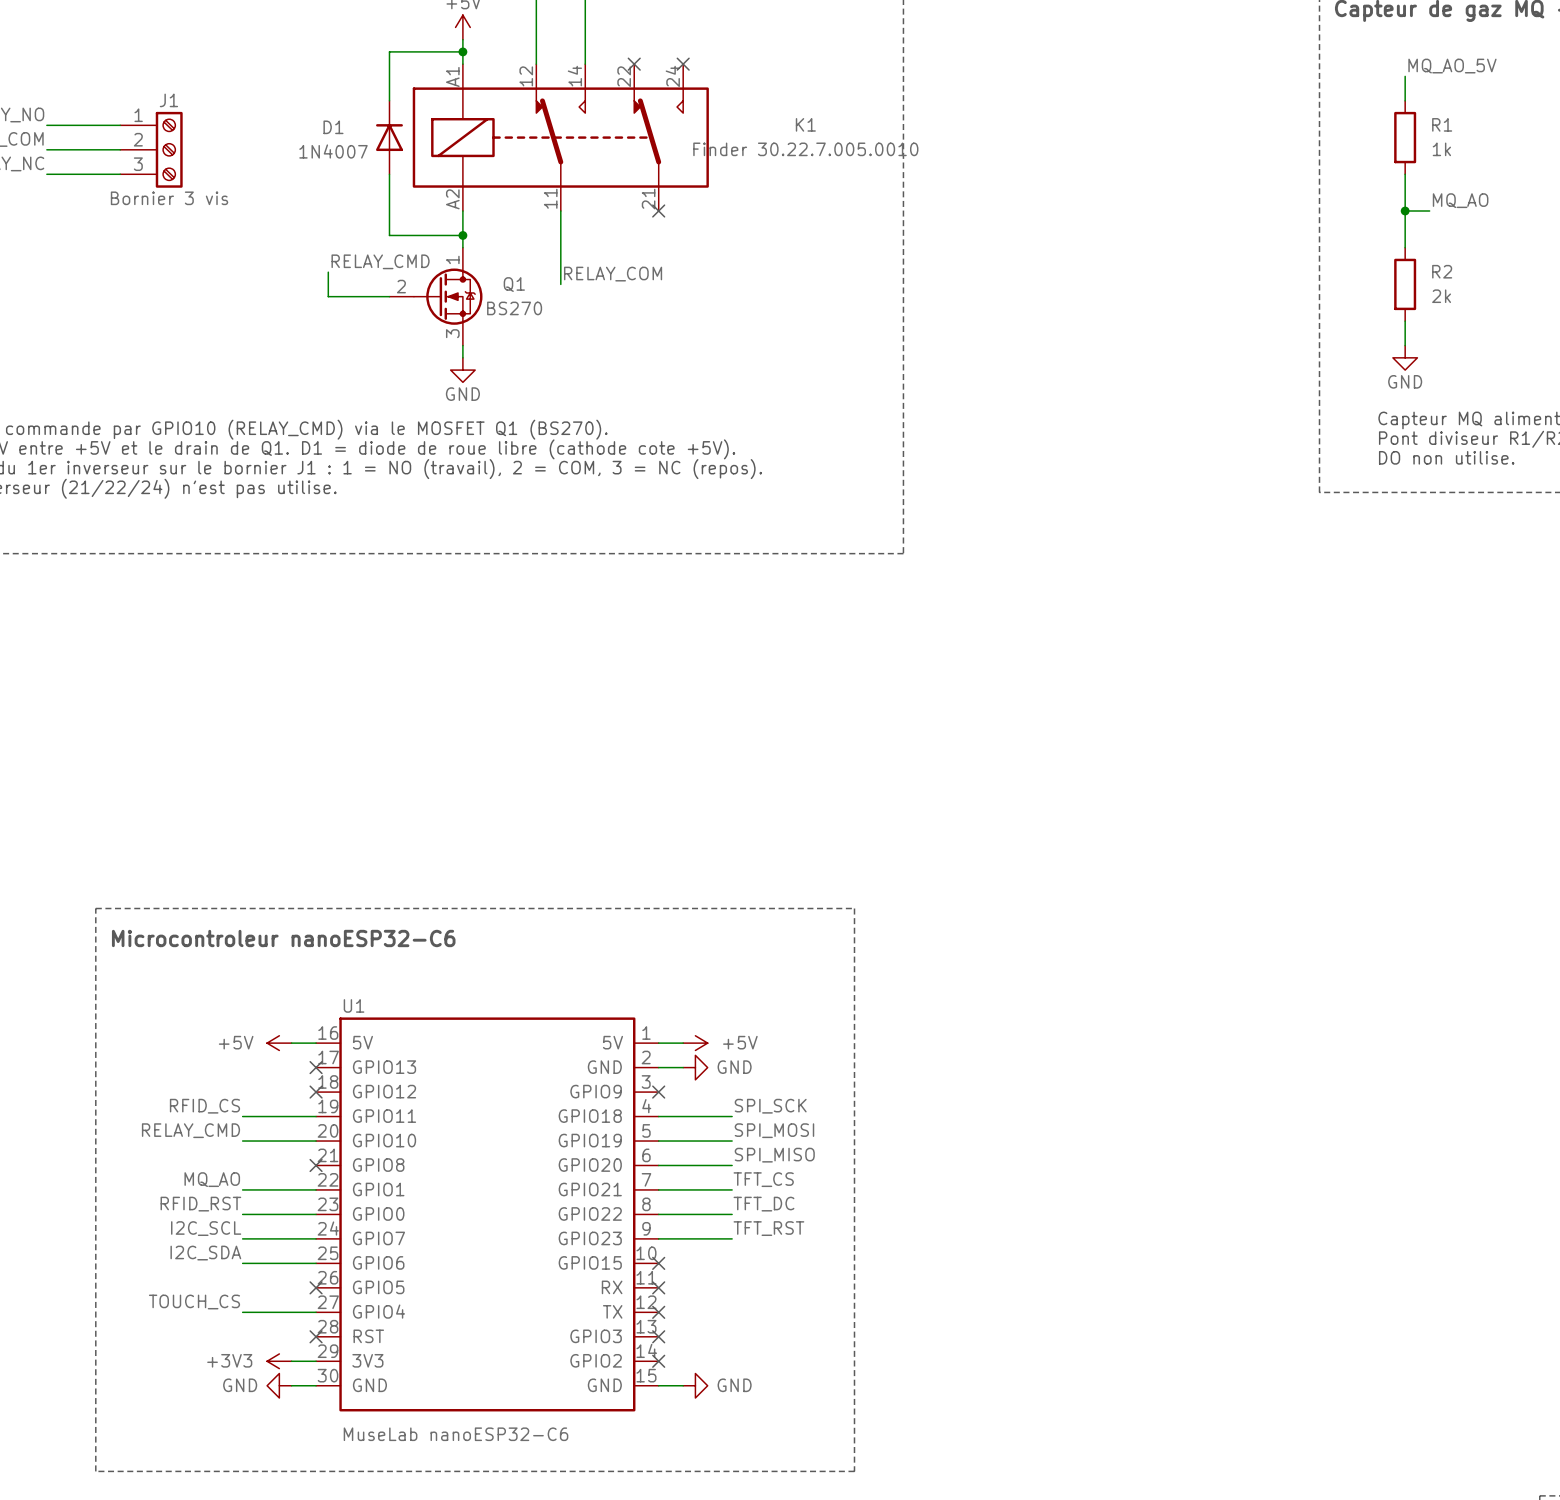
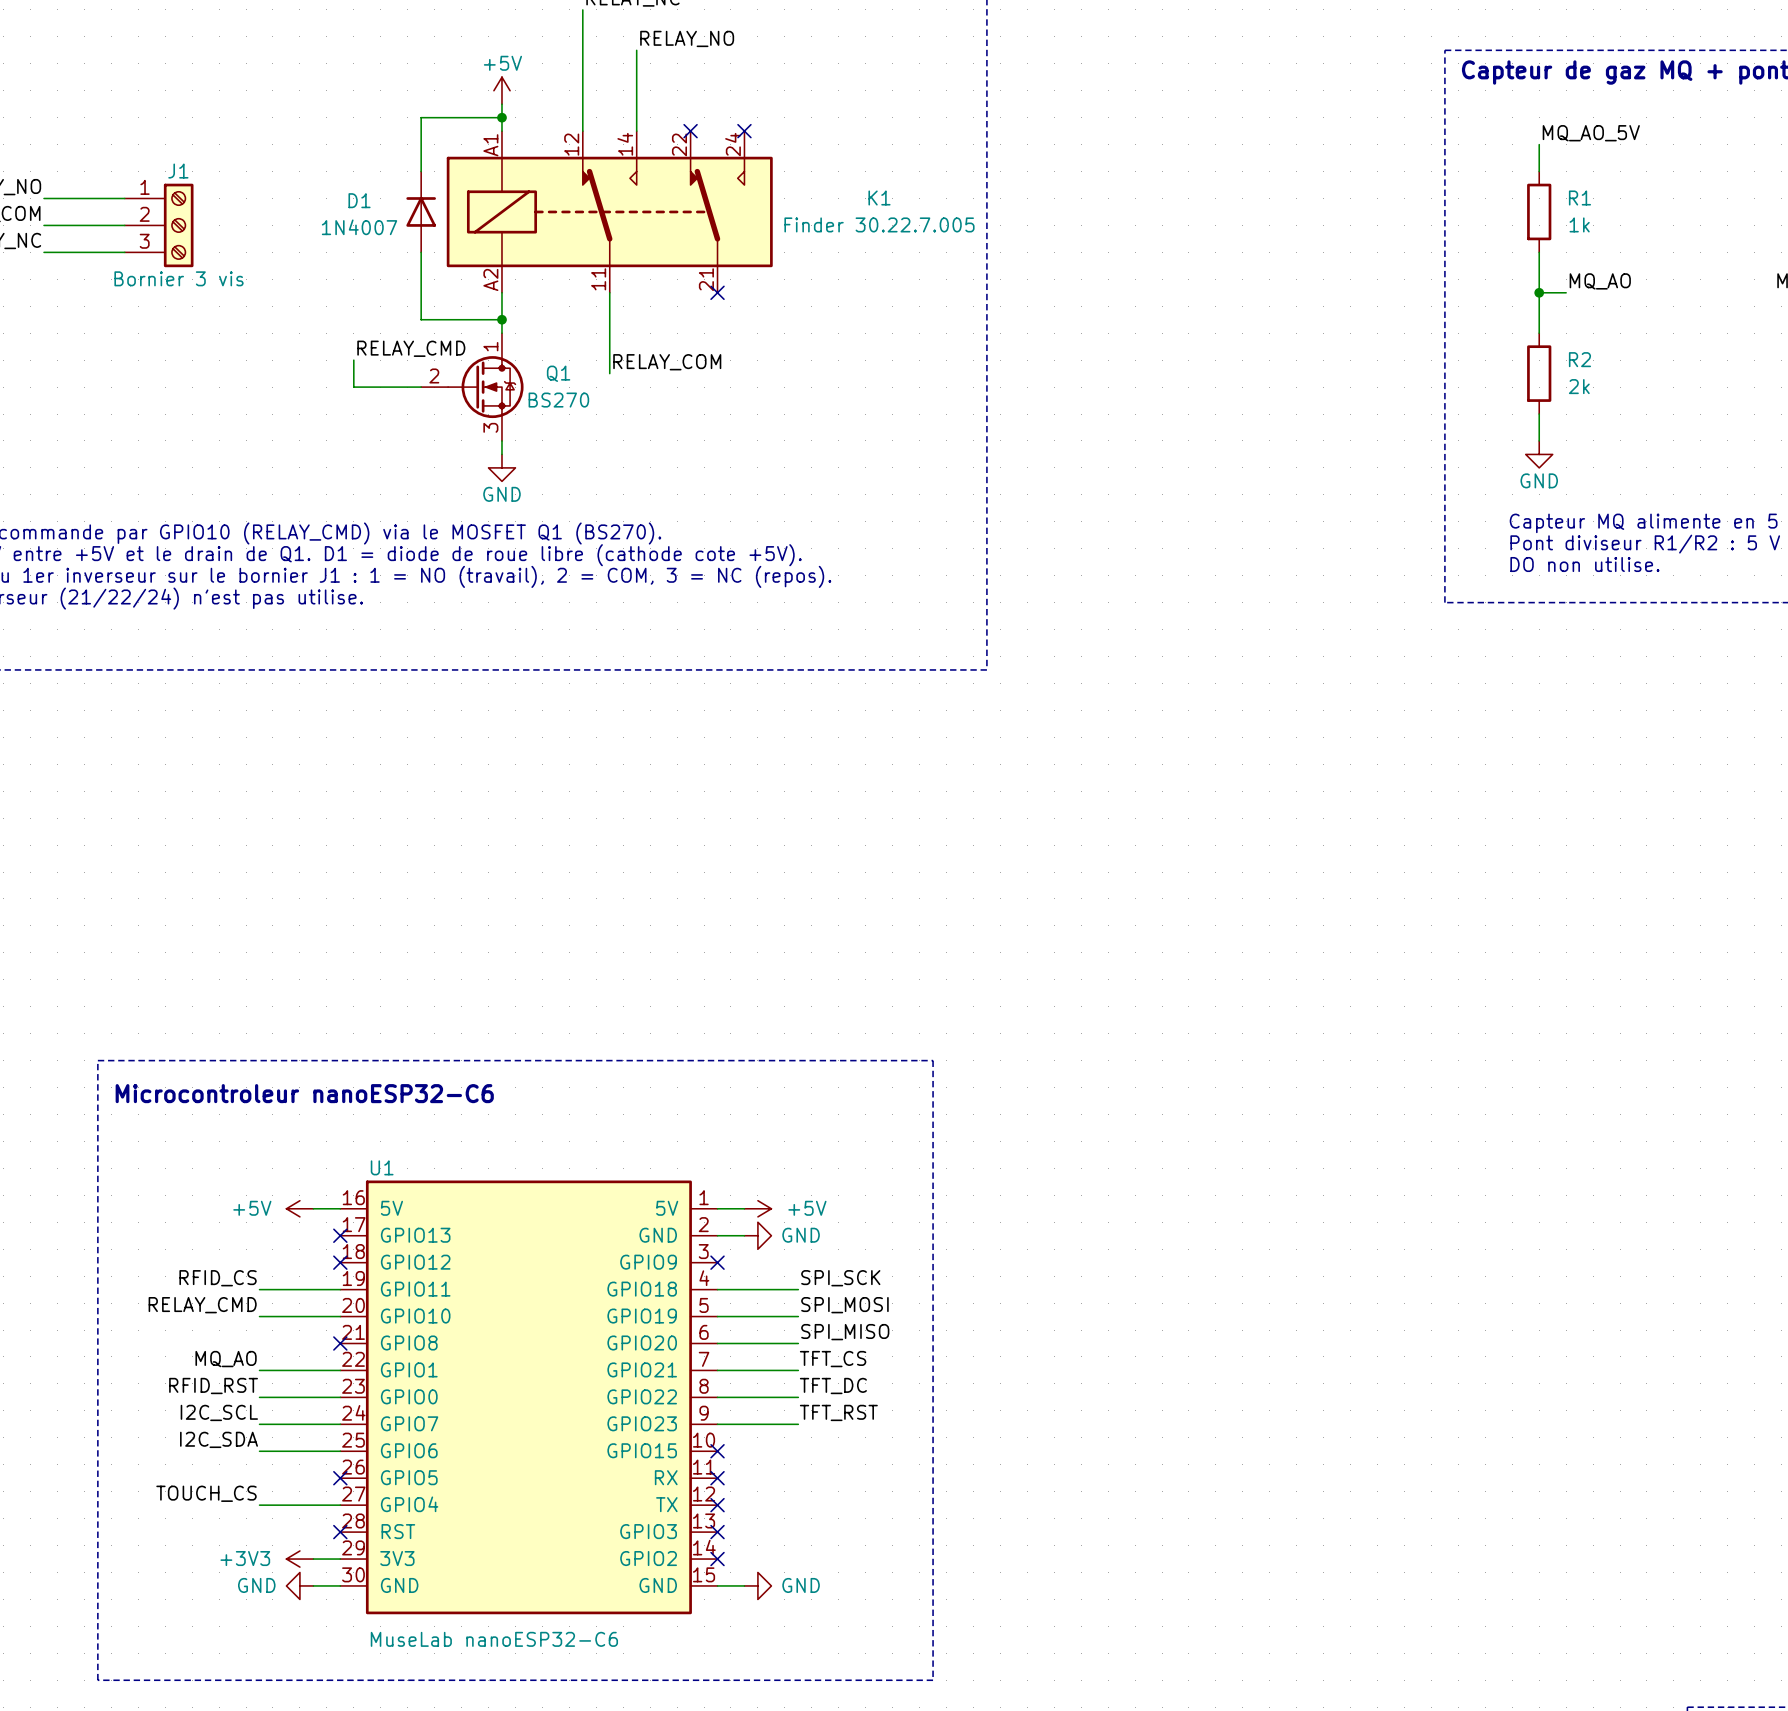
K1 value: Finder 30.22.7.005.0010 (805, 149) -> Finder 30.22.7.005 (879, 224)

